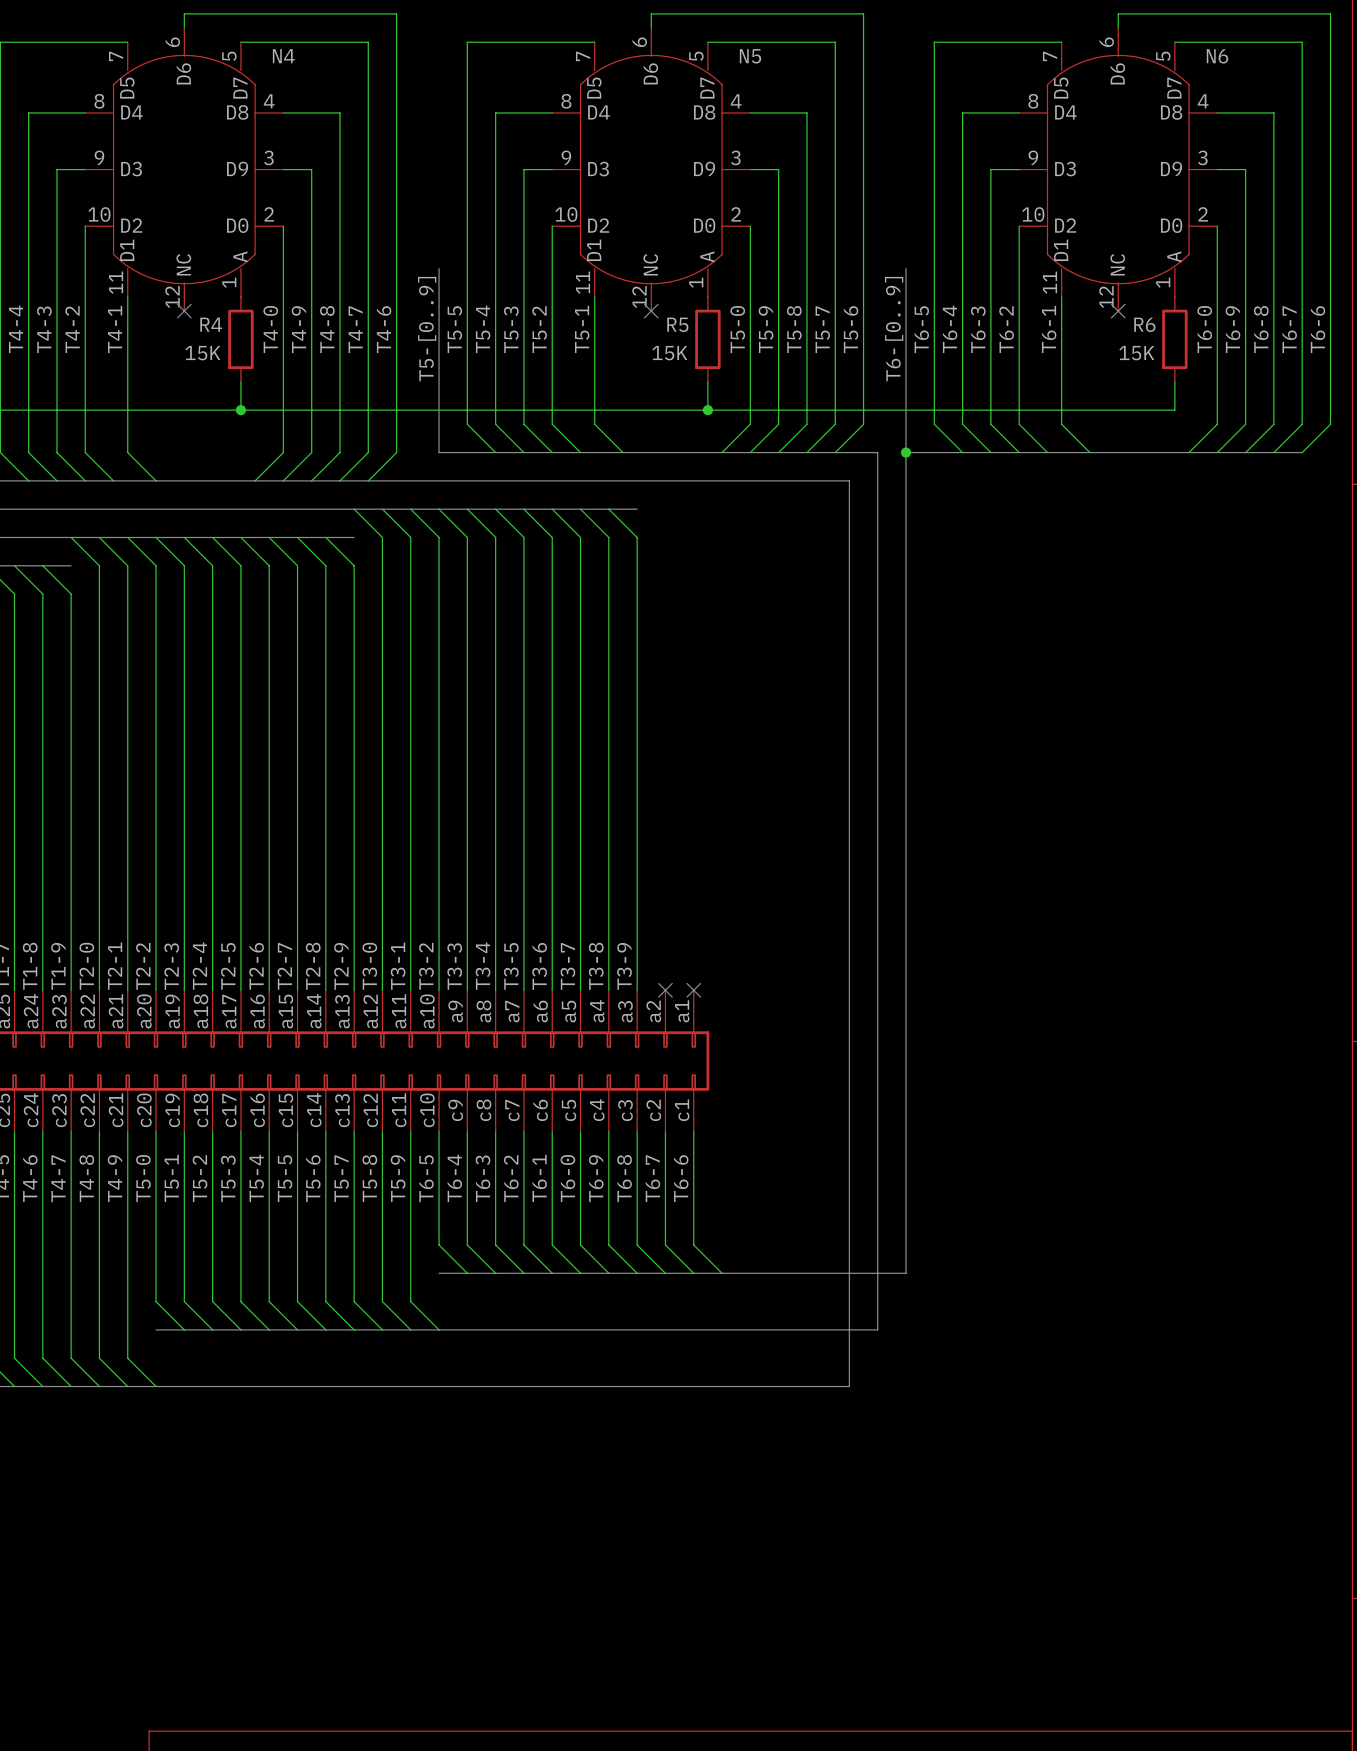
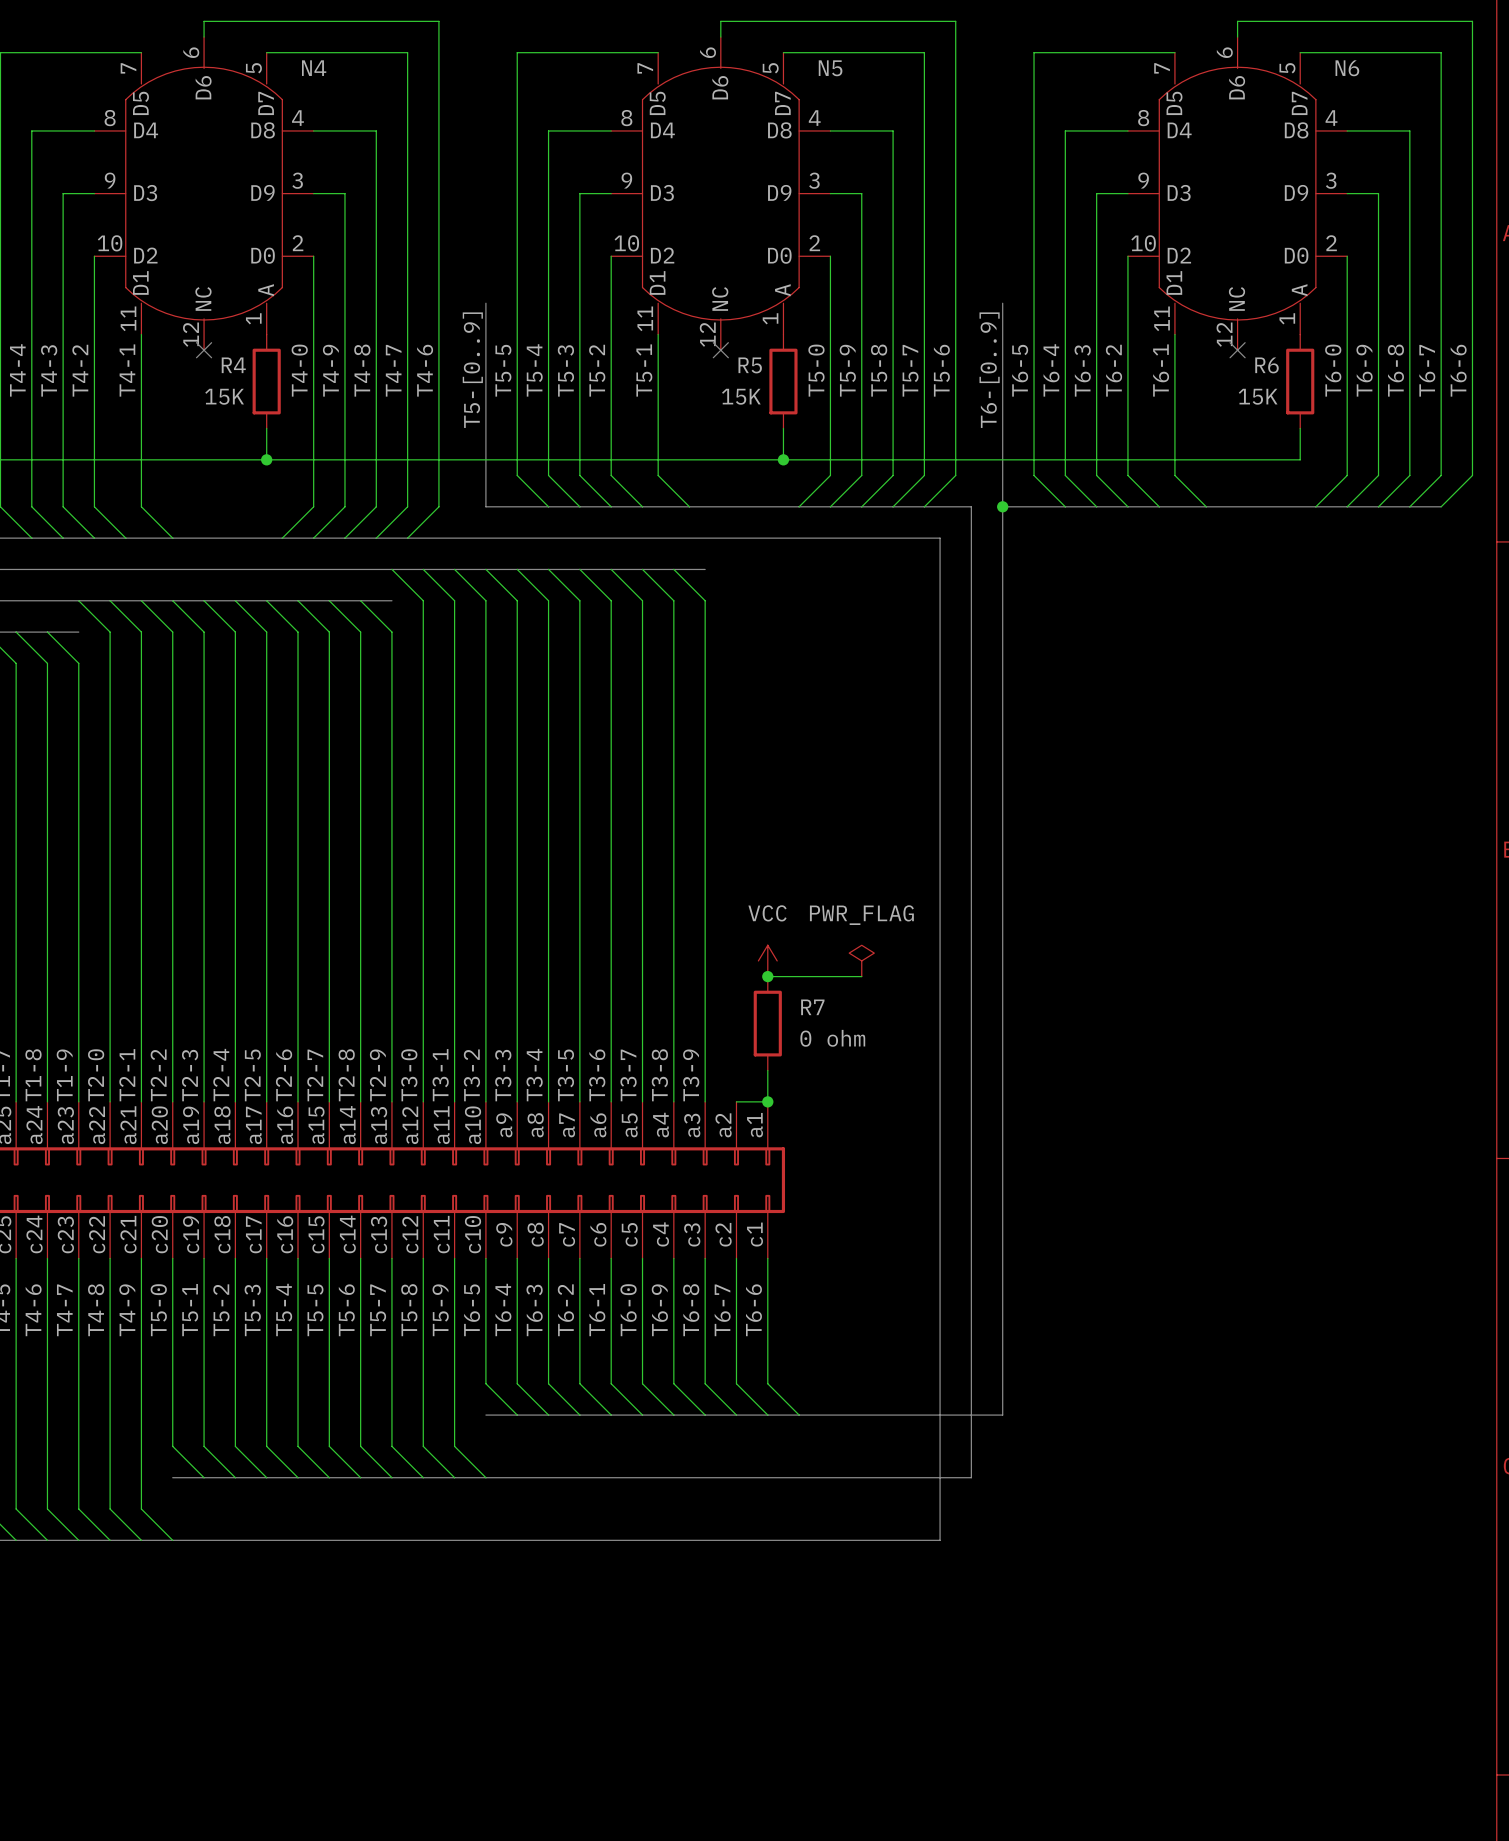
power symbol: none -> VCC (767, 960)
power symbol: none -> PWR_FLAG (861, 960)
wire: none -> (767, 976) (861, 976)
junction: none -> (767, 976)
R7: none -> 0 ohm (767, 1023)
wire: none -> (767, 1070) (767, 1101) (736, 1101)
no-connect mark: (665, 990) -> none
no-connect mark: (693, 990) -> none
junction: none -> (767, 1101)

